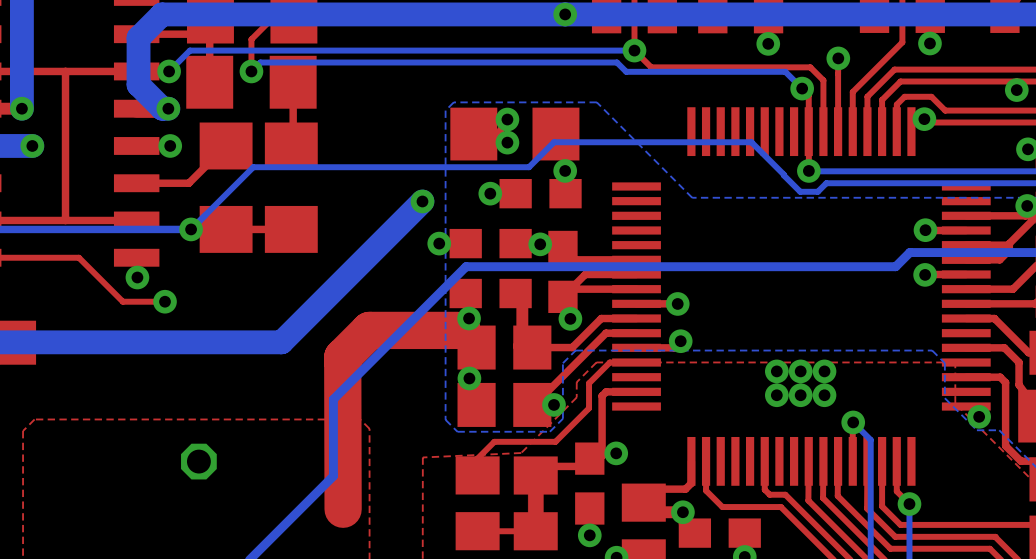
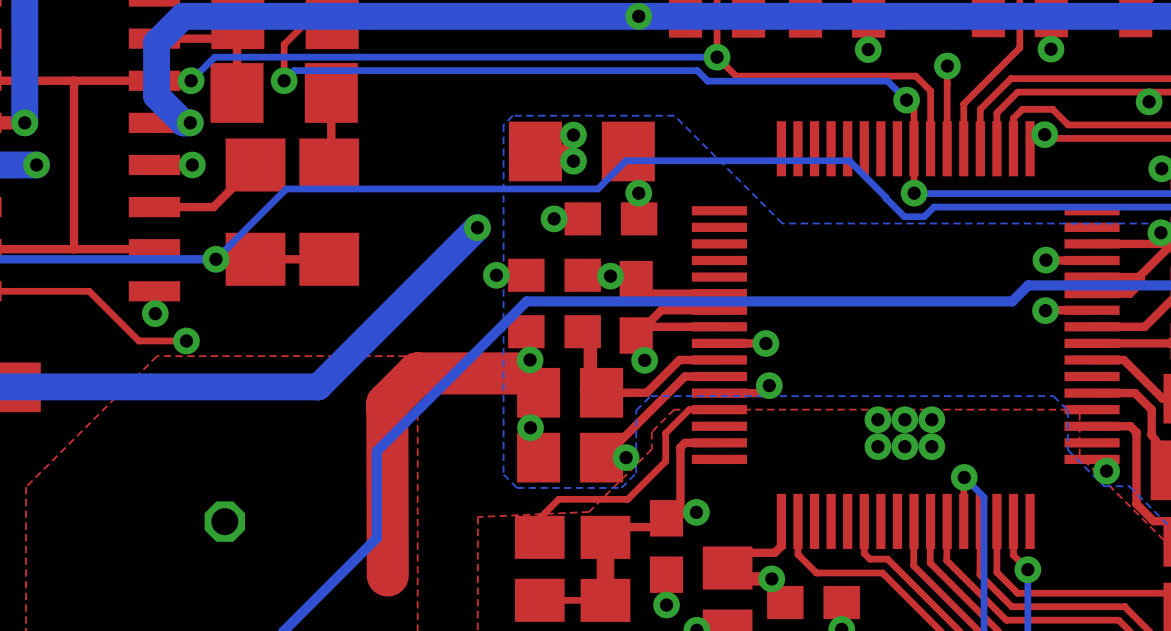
top zone outline: (34, 419) (360, 419) (369, 428) -> (39, 474) (157, 356) (417, 356) (417, 484)

